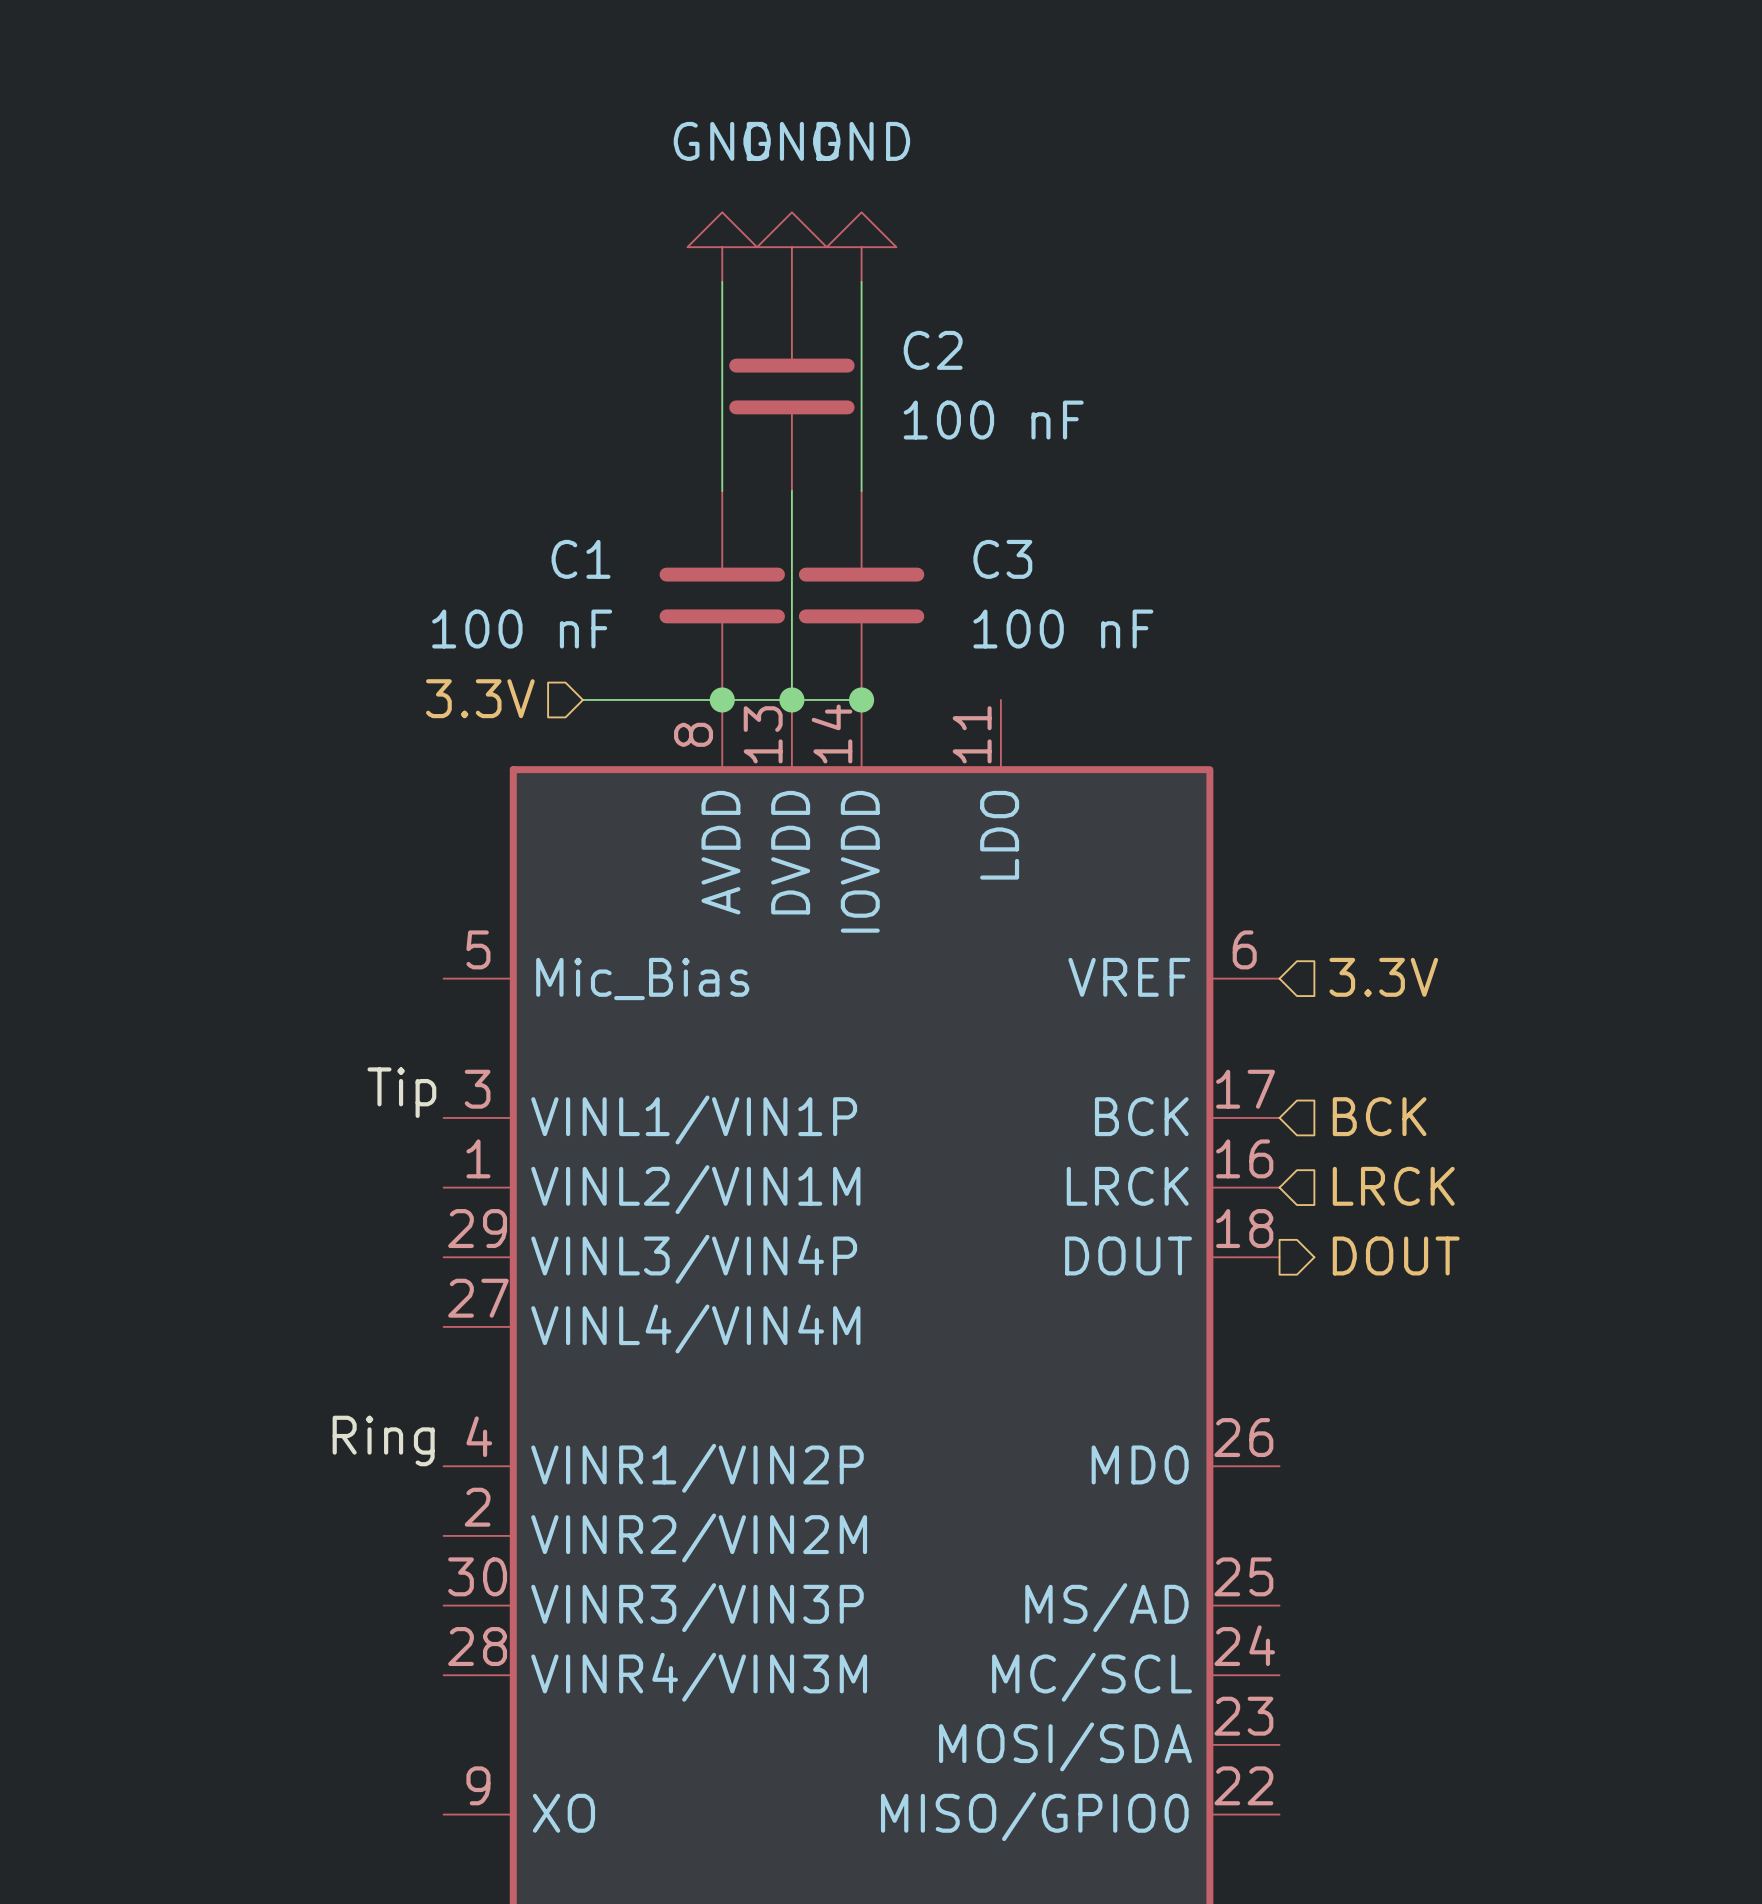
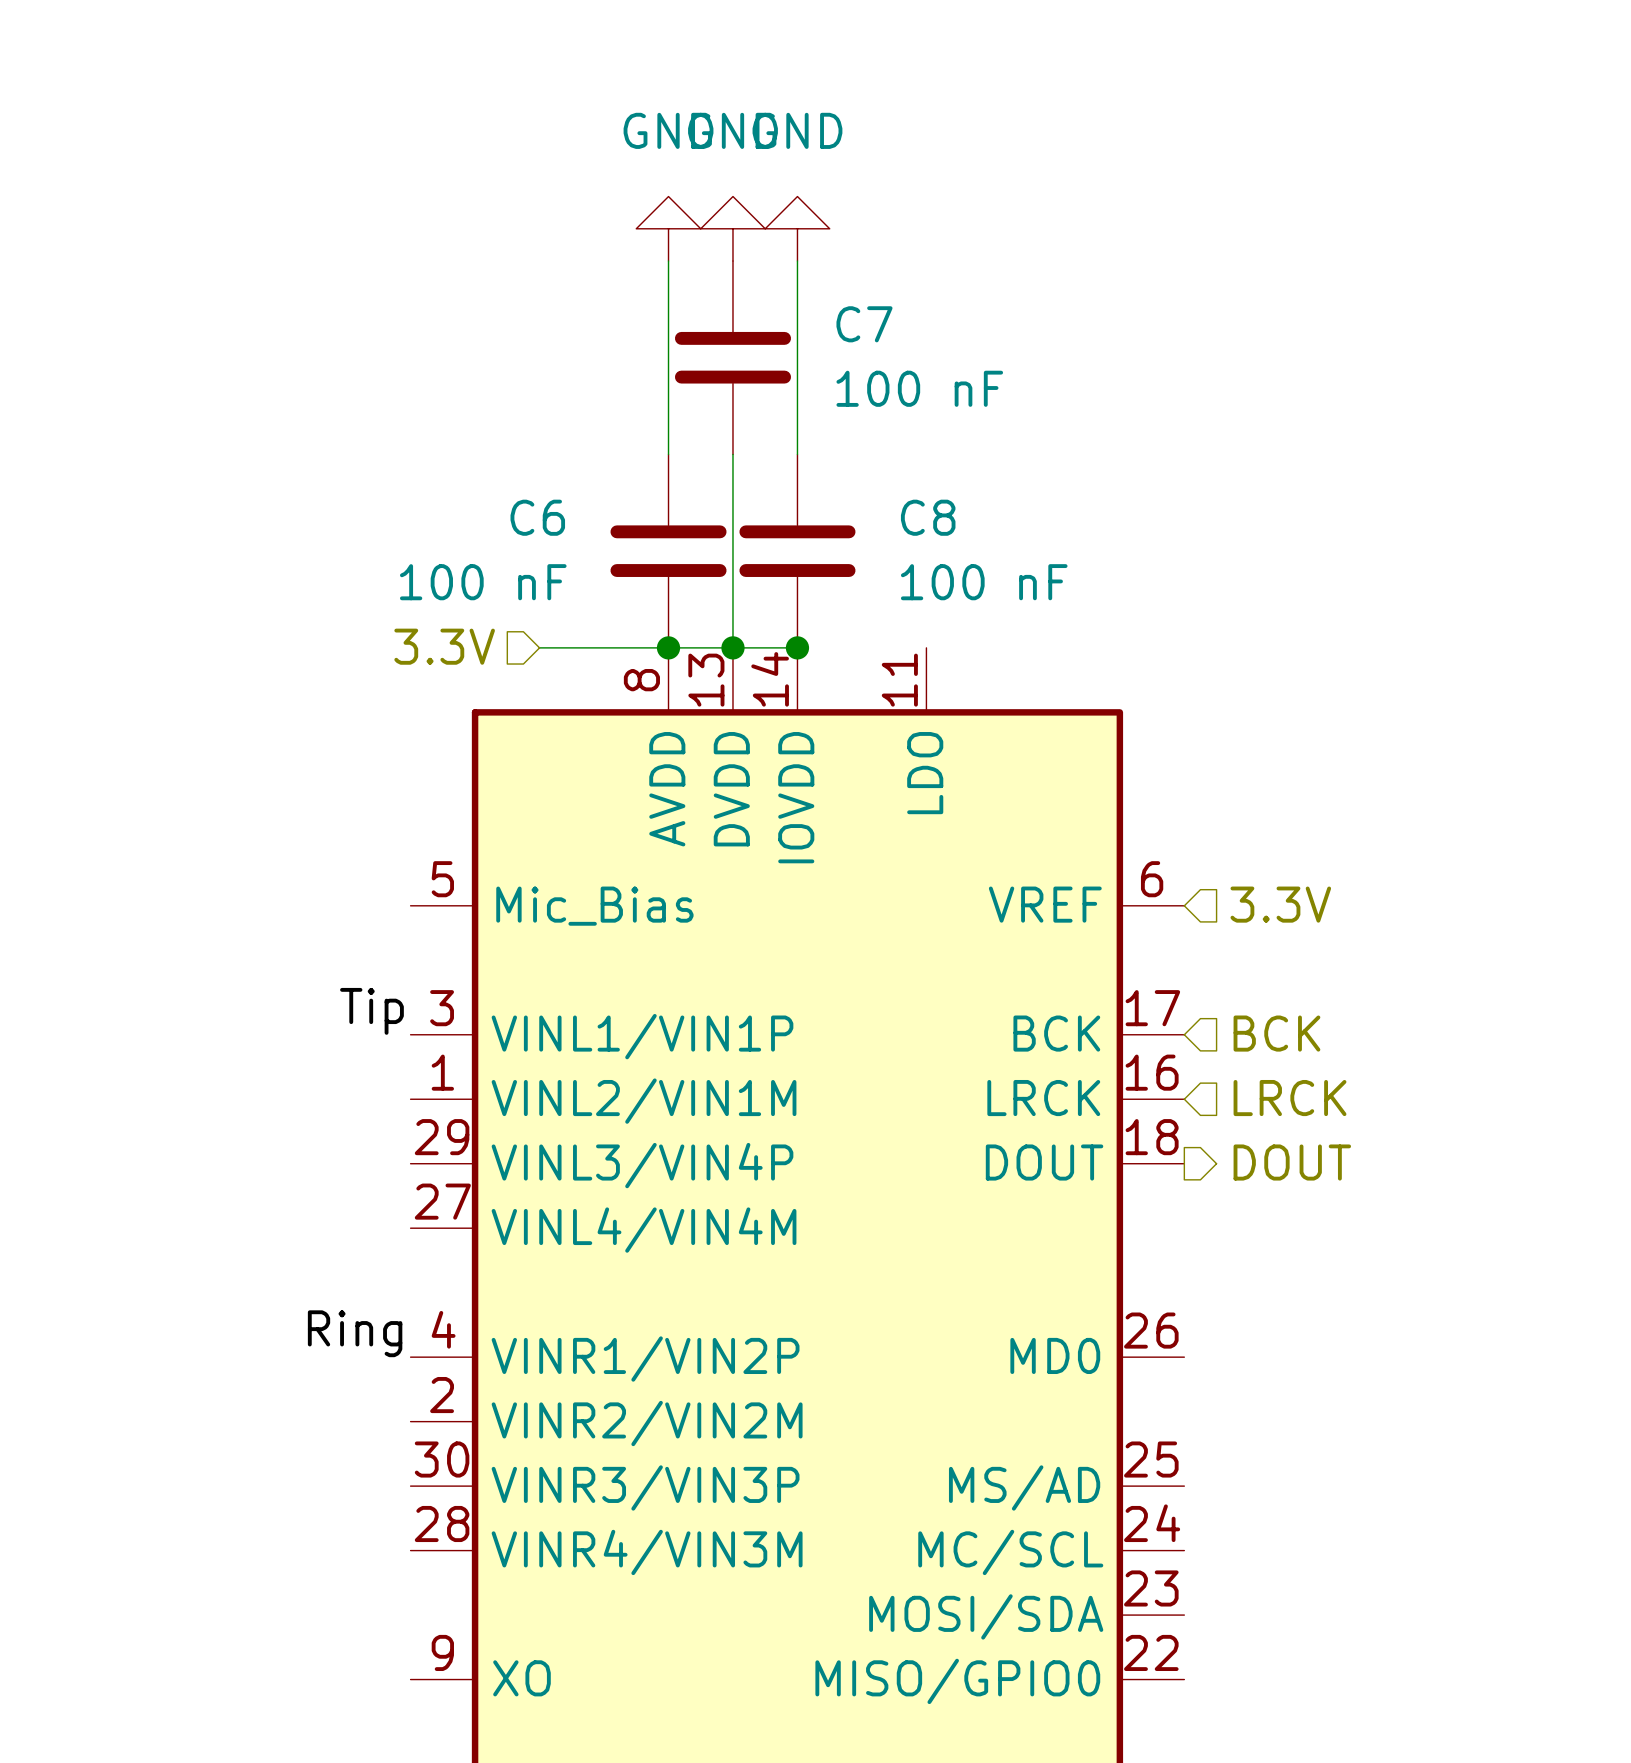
C2 name: C2 (933, 350) -> C7 (864, 324)
C1 name: C1 (581, 559) -> C6 (537, 517)
C3 name: C3 (1002, 559) -> C8 (928, 517)

